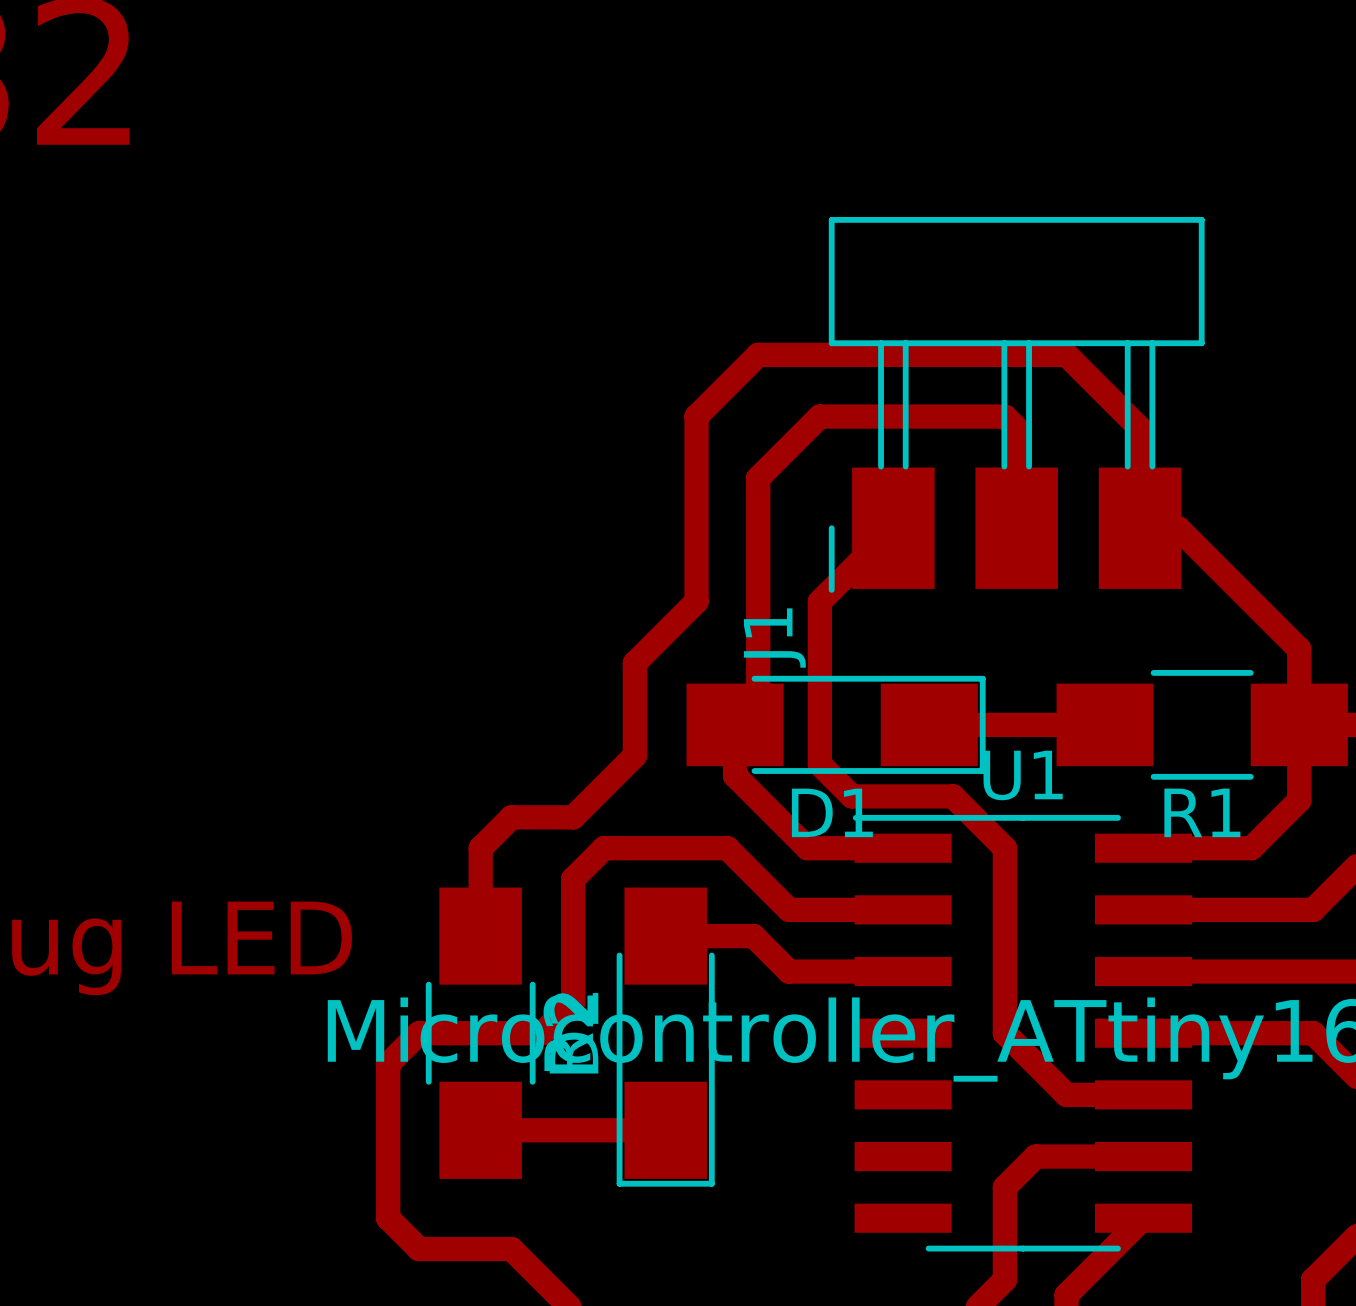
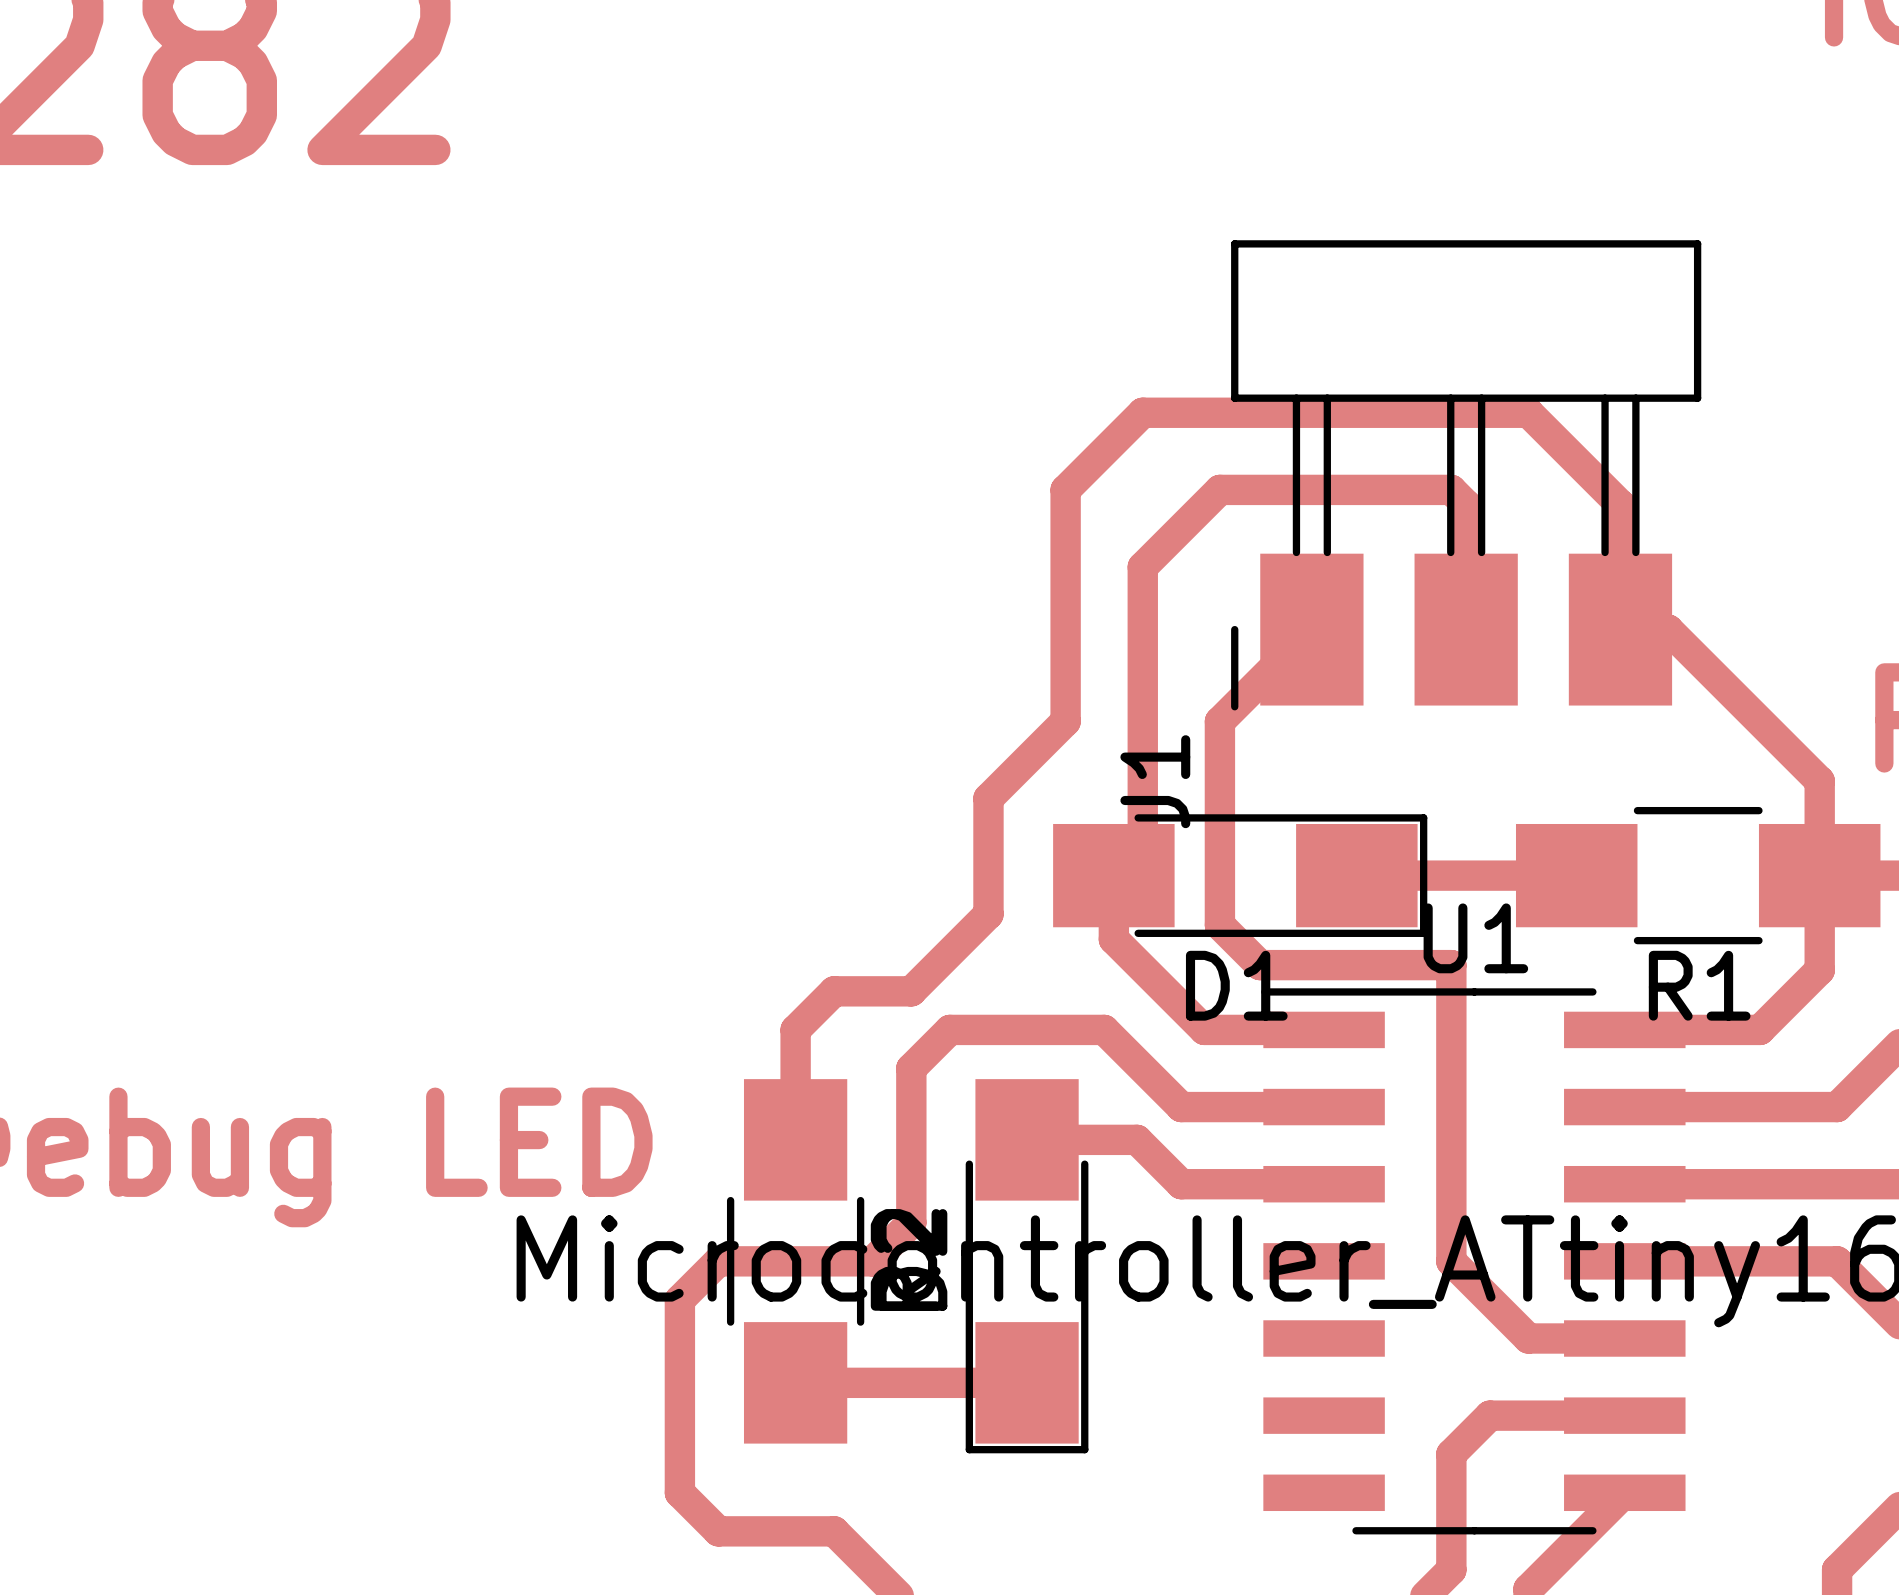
track: (953, 796) (1004, 848) -> (1386, 965) (1451, 965) (1451, 1029)

